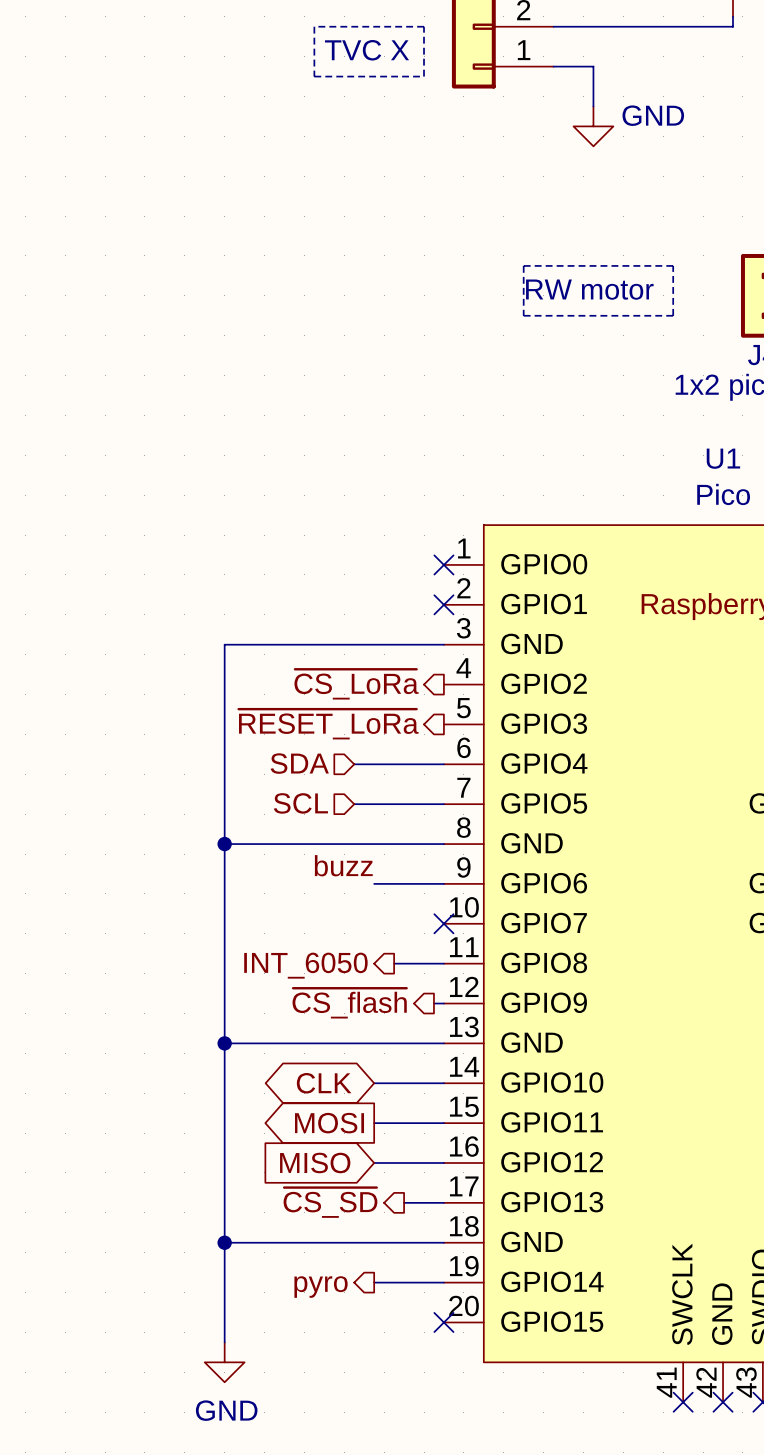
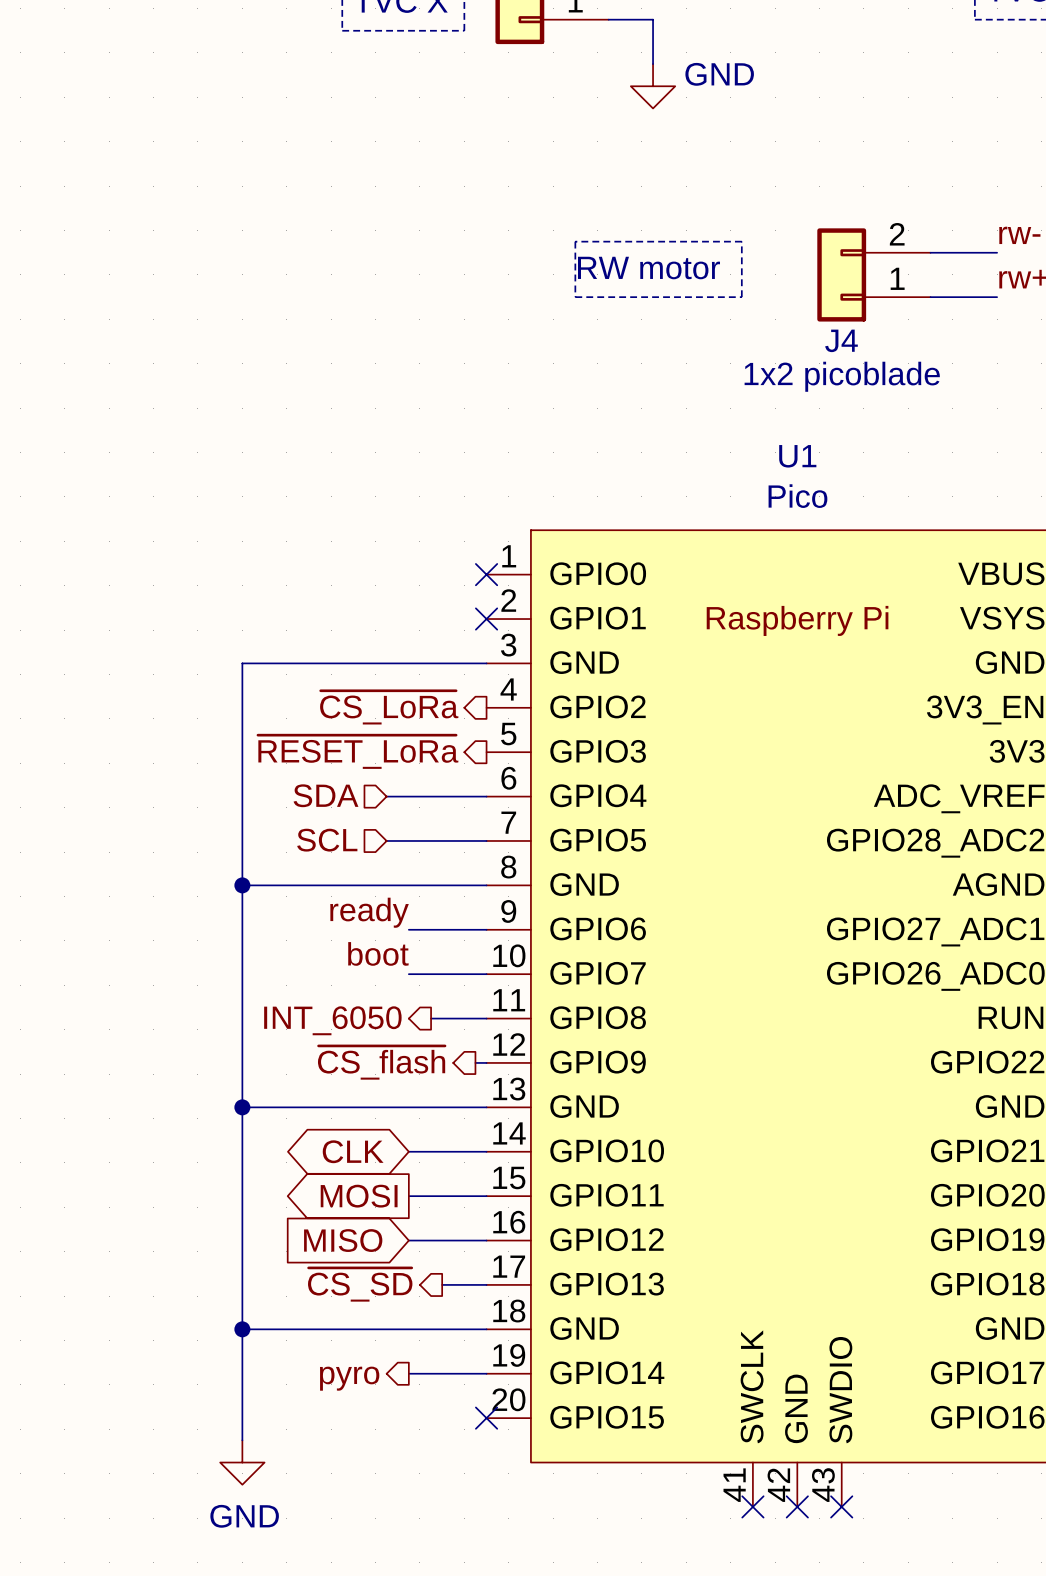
label: buzz (343, 865) -> ready (369, 912)
label: none -> boot (378, 953)
wire: none -> (408, 974) (486, 974)
no-connect mark: (443, 923) -> none

